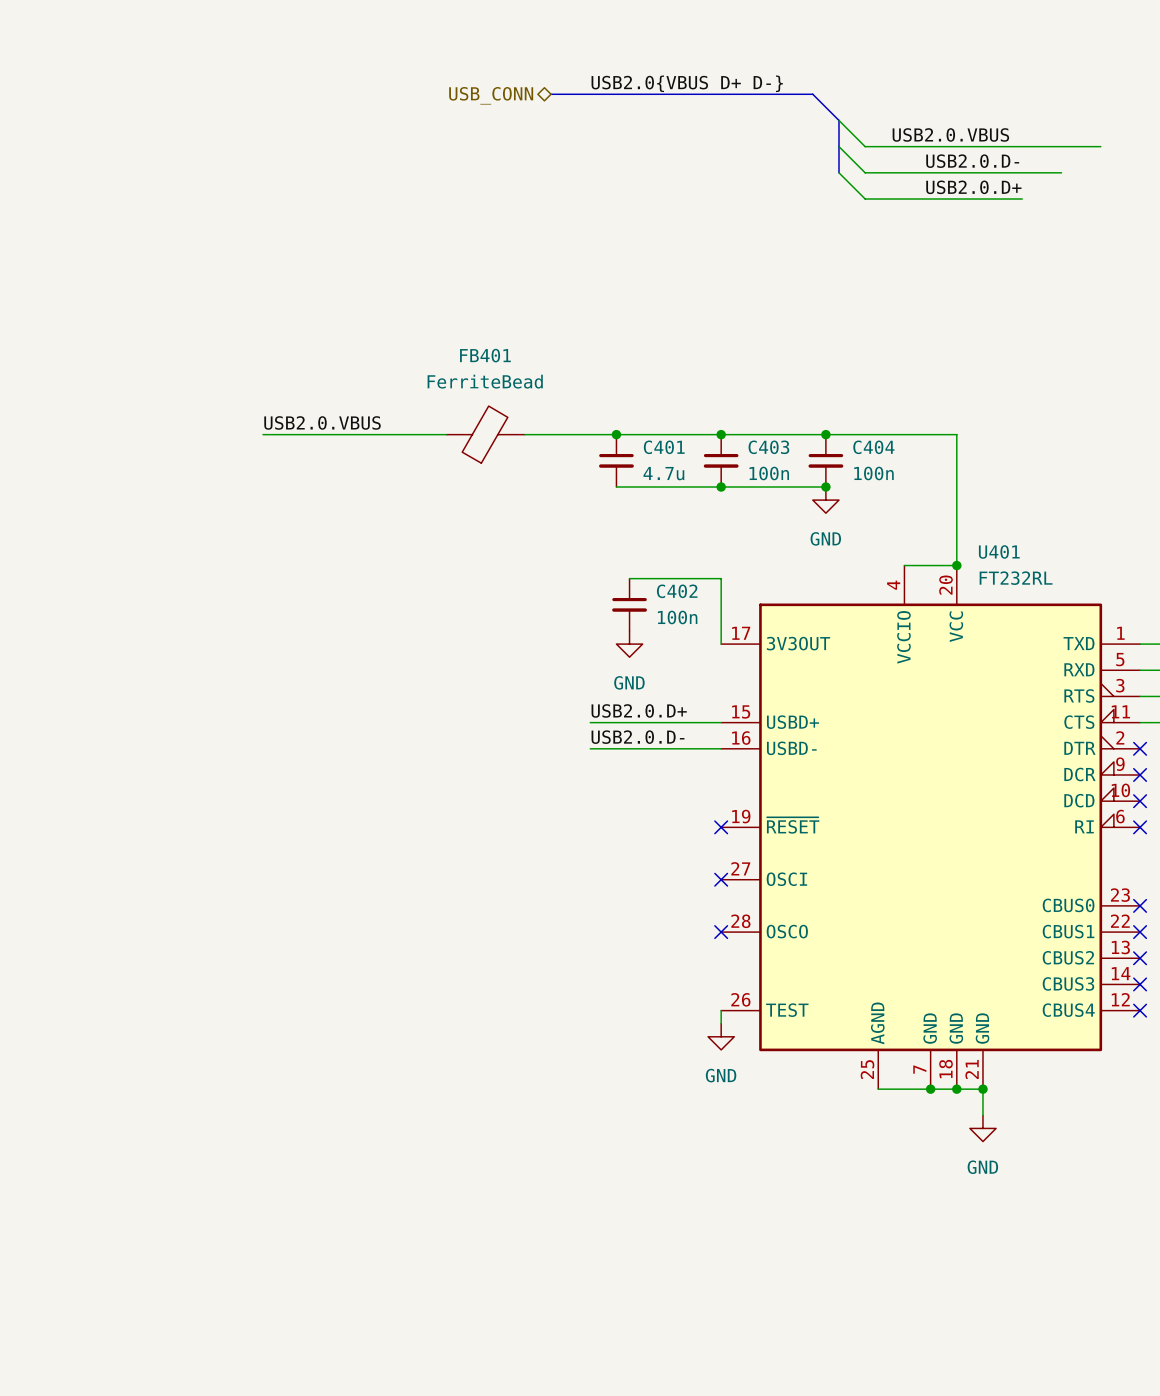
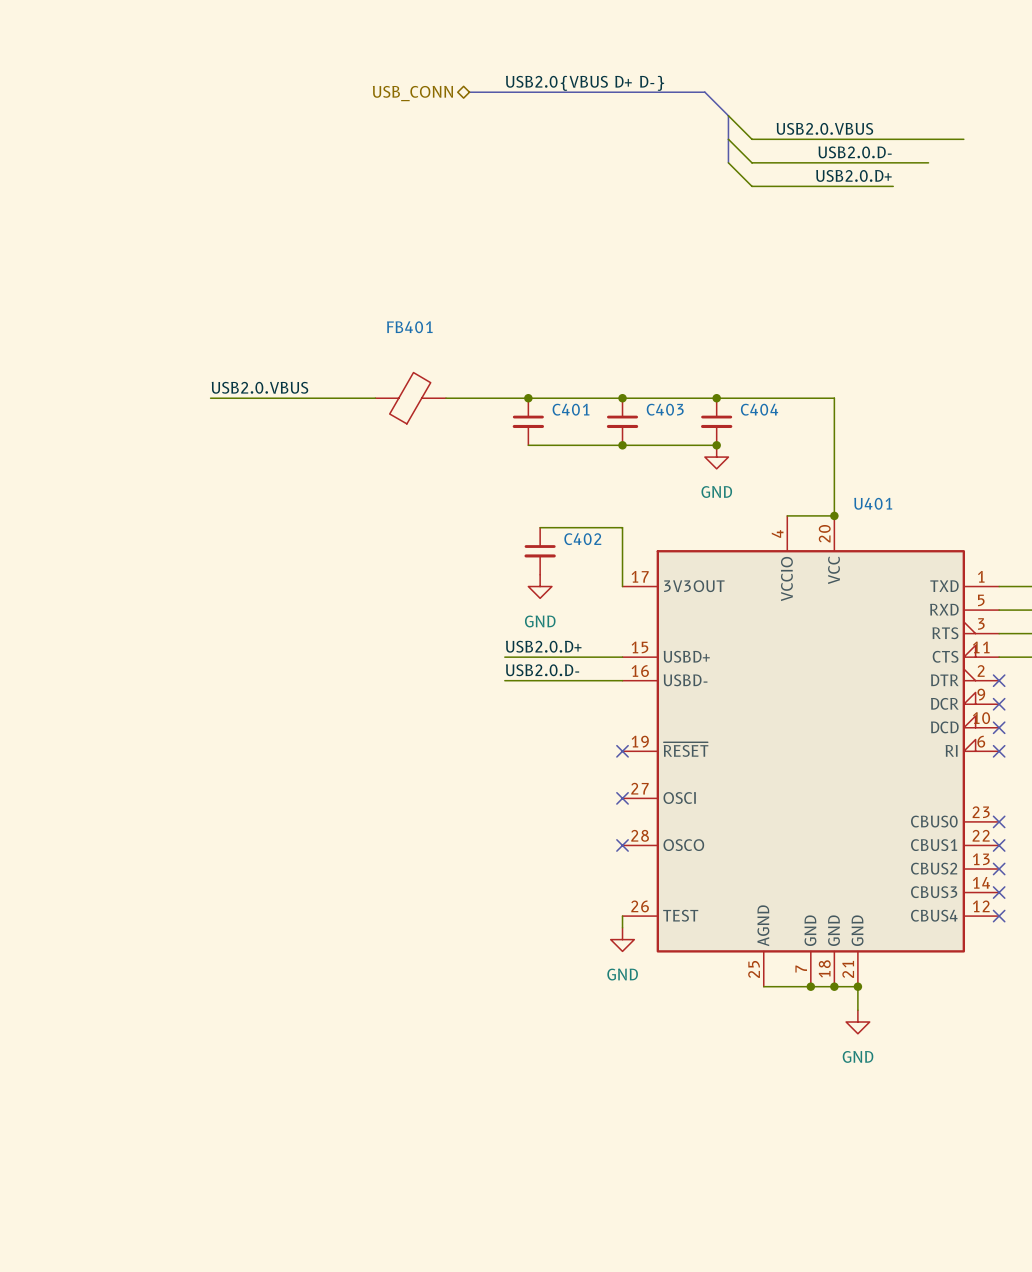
FB401 value: FerriteBead (485, 381) -> none
C401 value: 4.7u (663, 473) -> none
C403 value: 100n (769, 473) -> none
C404 value: 100n (873, 473) -> none
U401 value: FT232RL (1016, 578) -> none
C402 value: 100n (677, 617) -> none

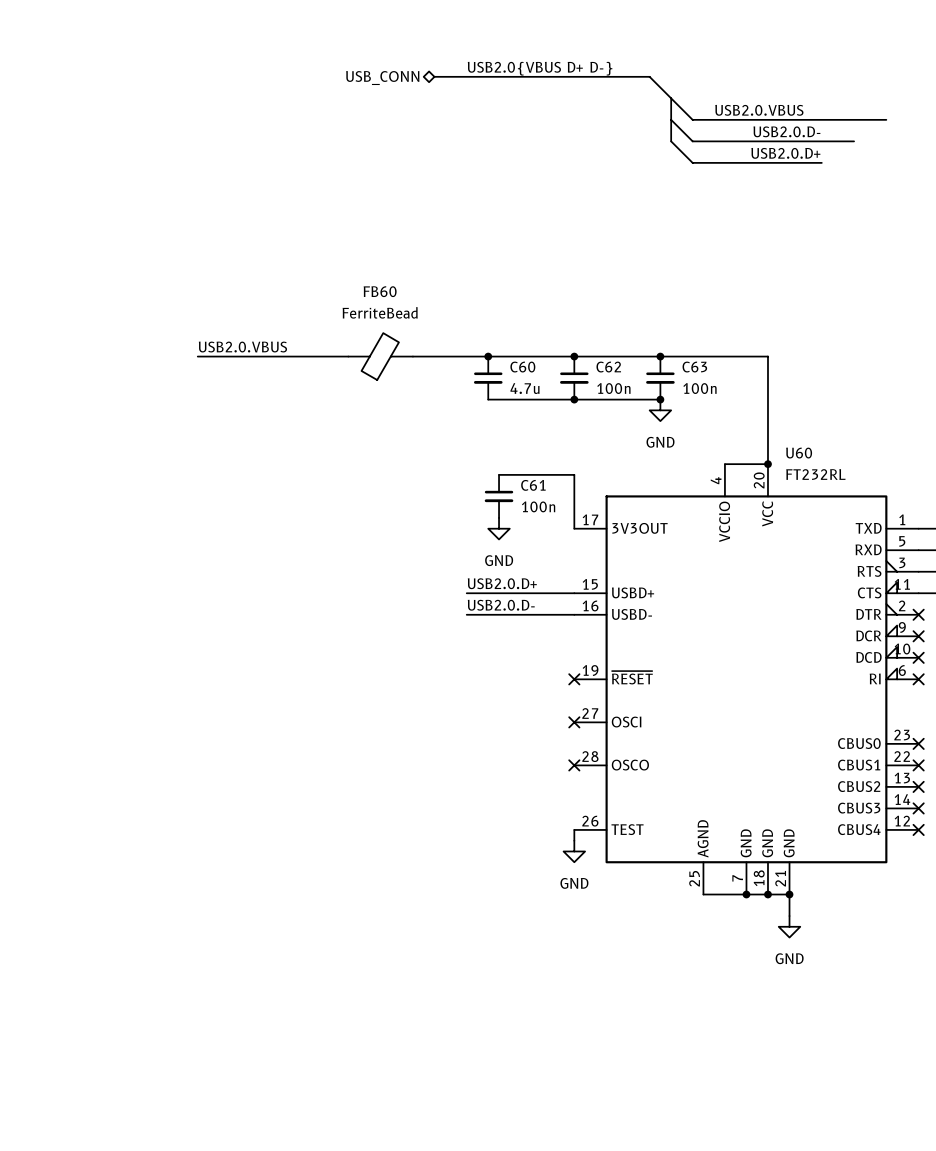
FB401 name: FB401 (409, 327) -> FB60 (380, 291)
FB401 value: none -> FerriteBead (380, 312)
C401 name: C401 (571, 409) -> C60 (522, 367)
C403 name: C403 (665, 409) -> C62 (608, 367)
C404 name: C404 (759, 409) -> C63 (694, 367)
C401 value: none -> 4.7u (525, 388)
C403 value: none -> 100n (613, 388)
C404 value: none -> 100n (699, 388)
U401 name: U401 (873, 503) -> U60 (799, 453)
U401 value: none -> FT232RL (815, 474)
C402 name: C402 (582, 539) -> C61 (533, 485)
C402 value: none -> 100n (538, 506)

